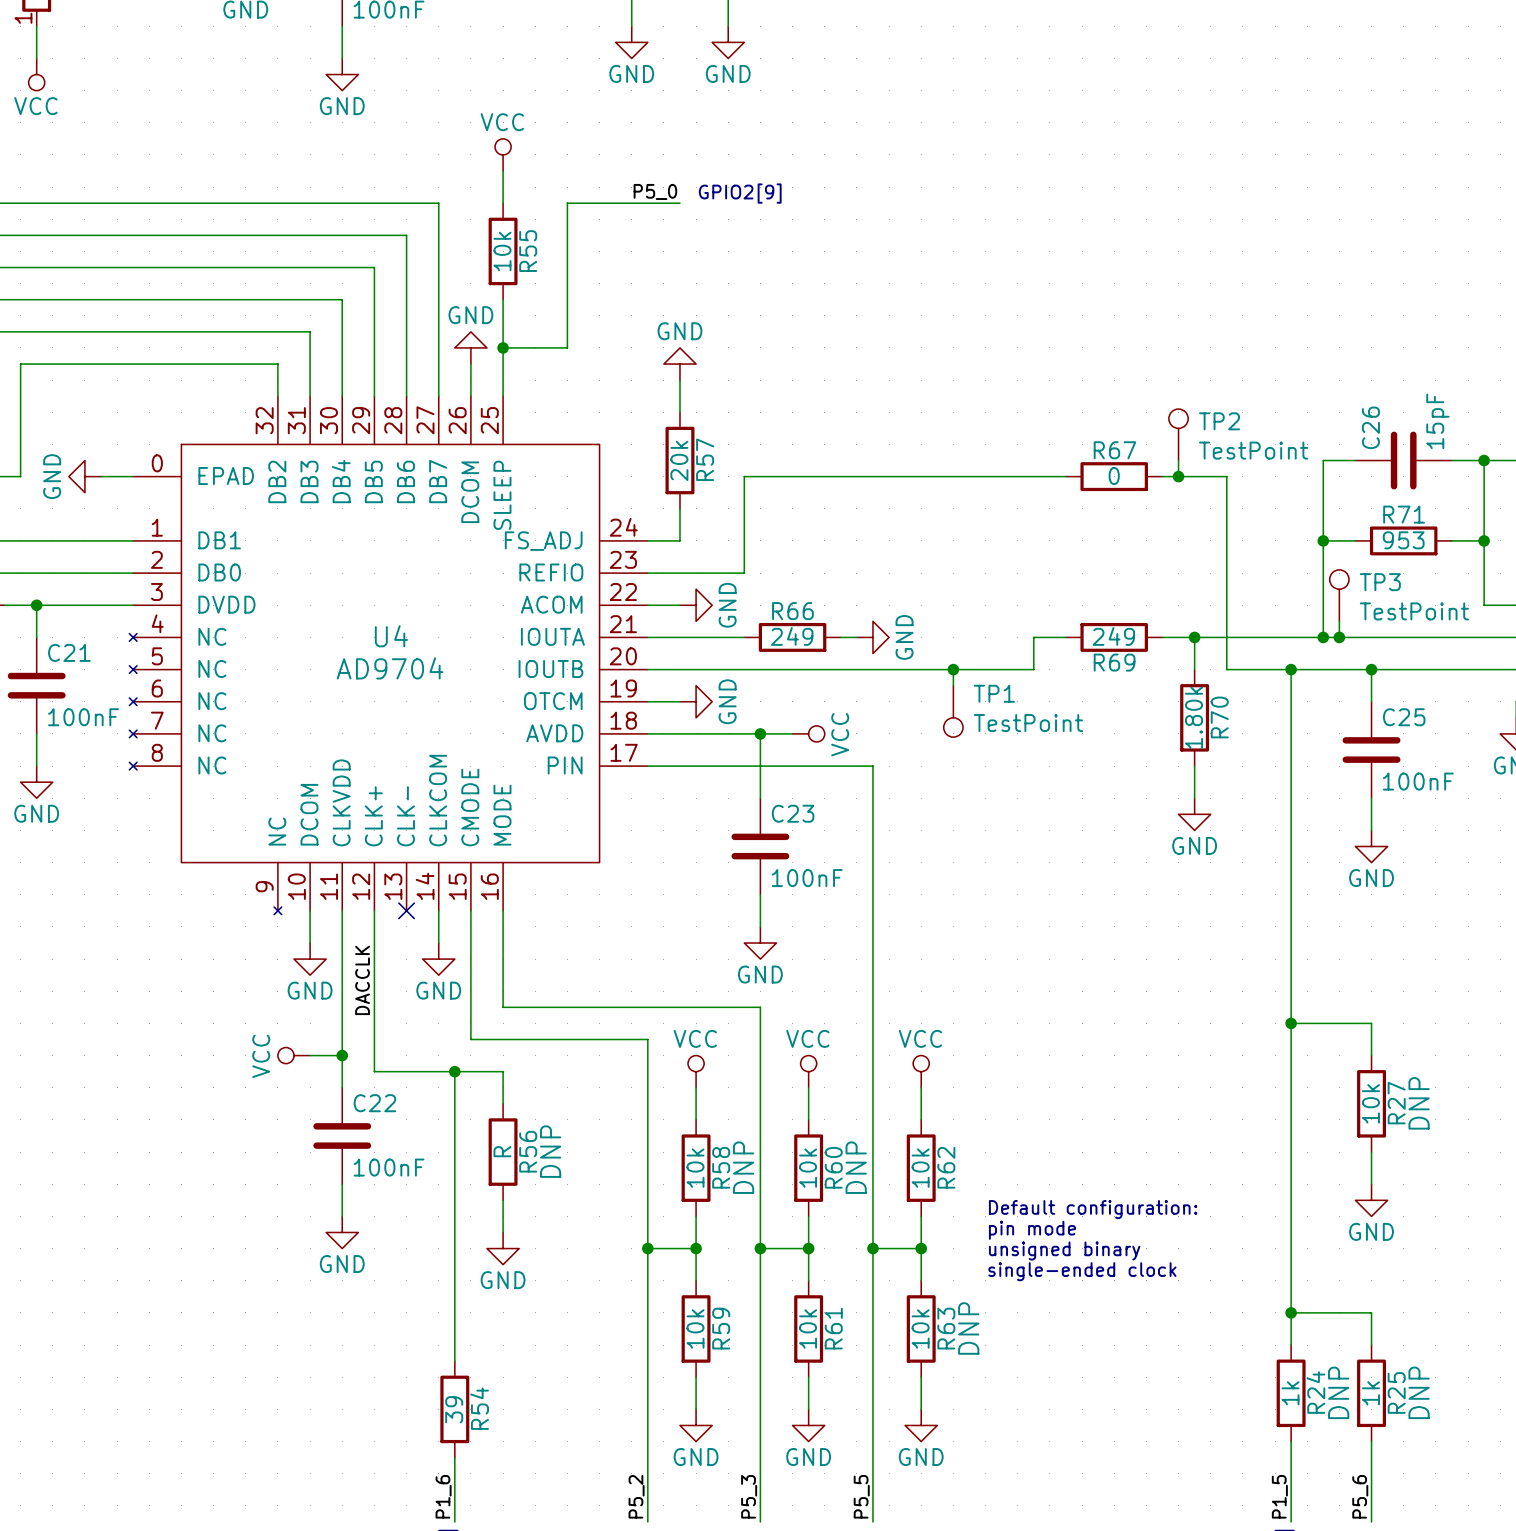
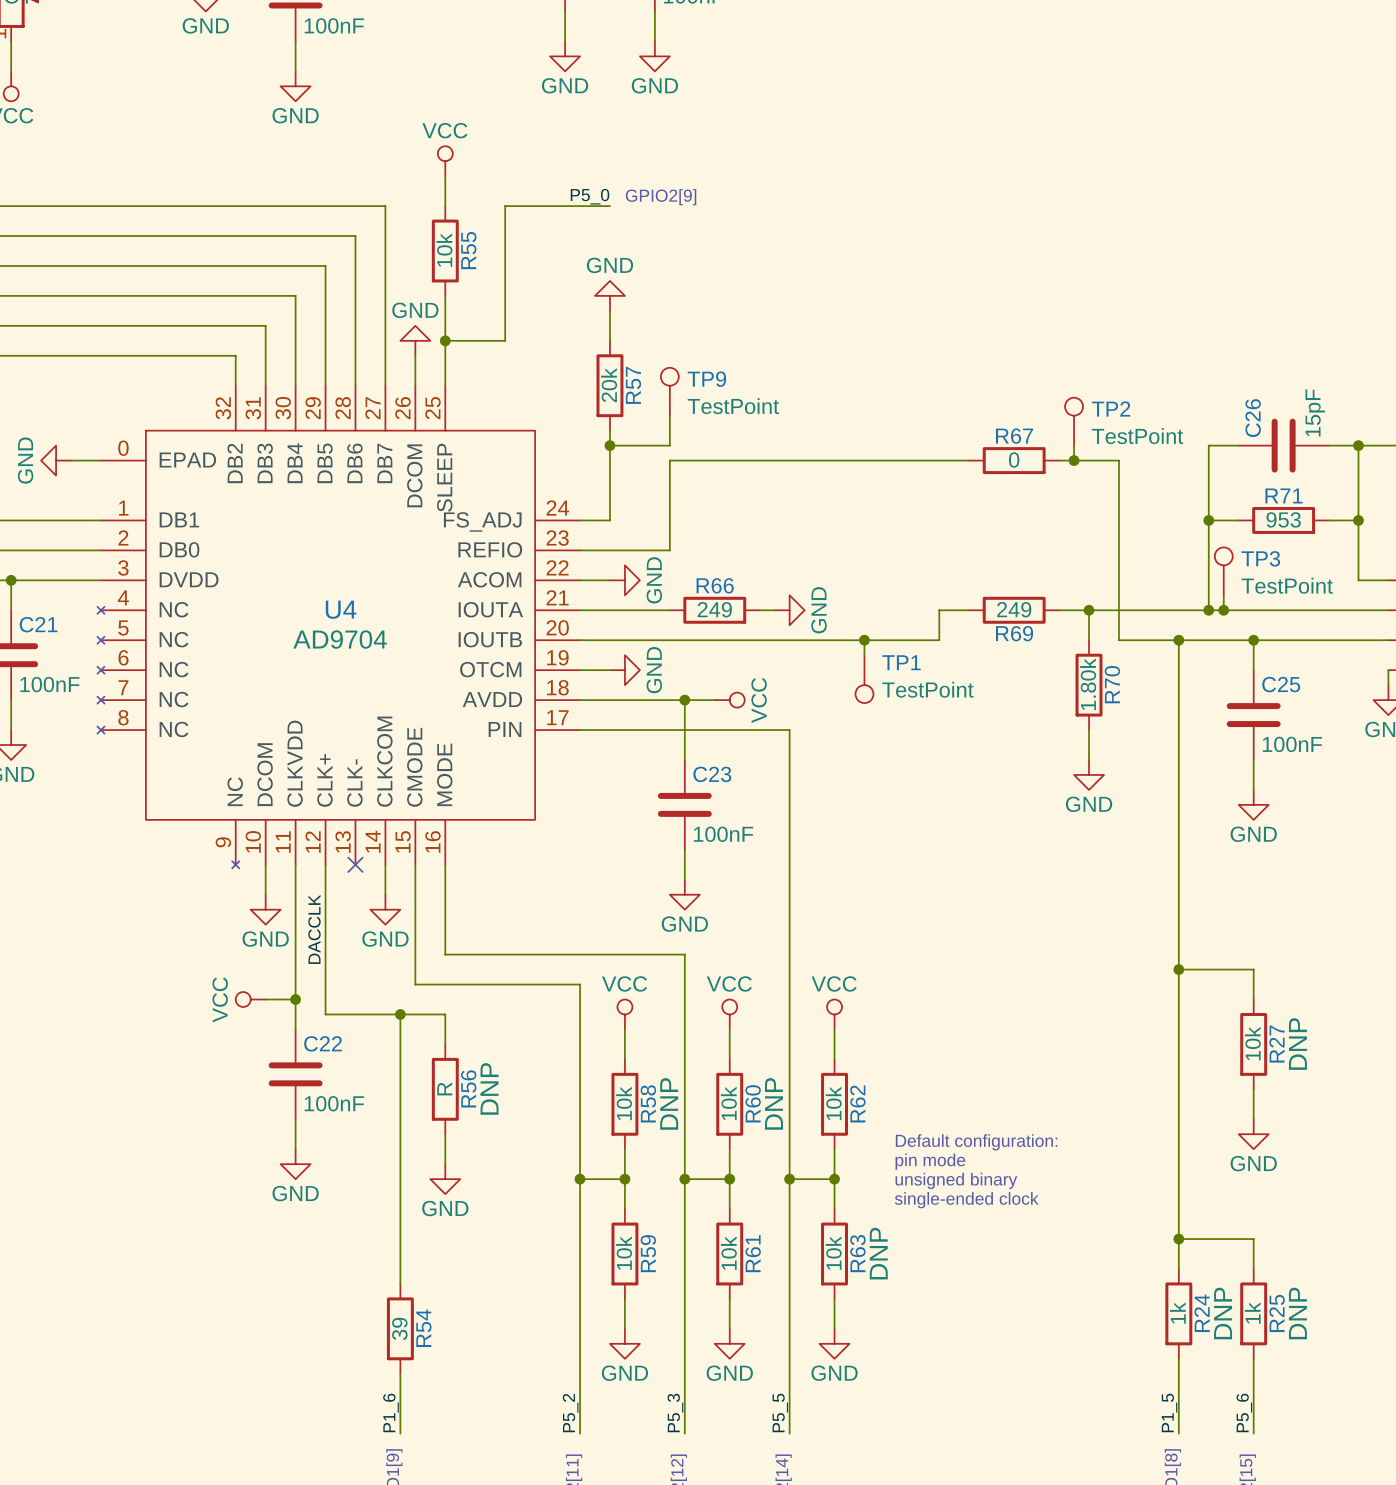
power symbol position: GND (679, 364) -> GND (609, 295)
wire: (679, 380) (679, 412) -> (609, 310) (609, 340)
TP9: none -> TestPoint (669, 391)
wire: none -> (669, 415) (669, 445) (609, 445)
wire: none -> (609, 430) (609, 490)
R57 position: (679, 460) -> (609, 385)
junction: none -> (609, 445)

